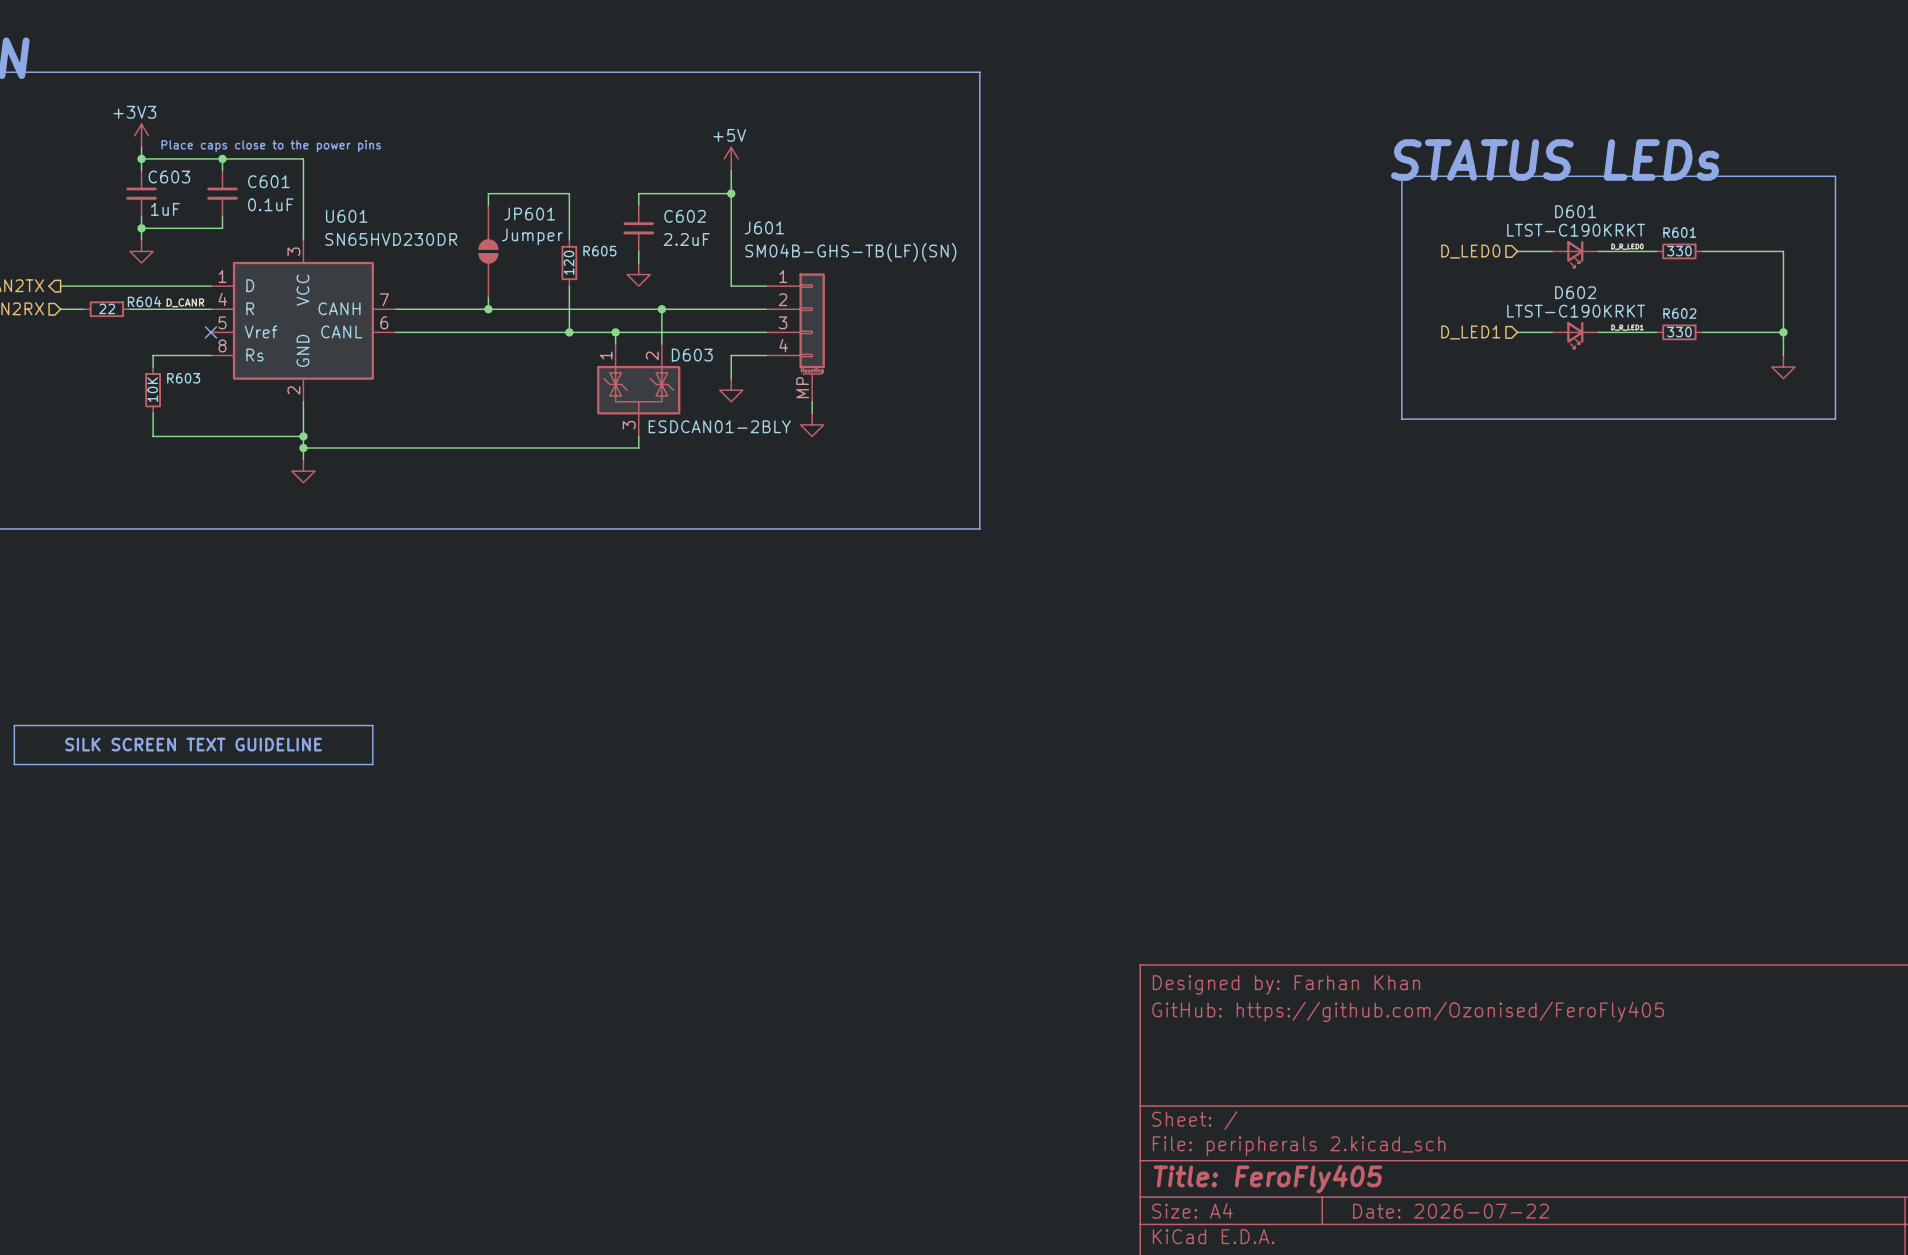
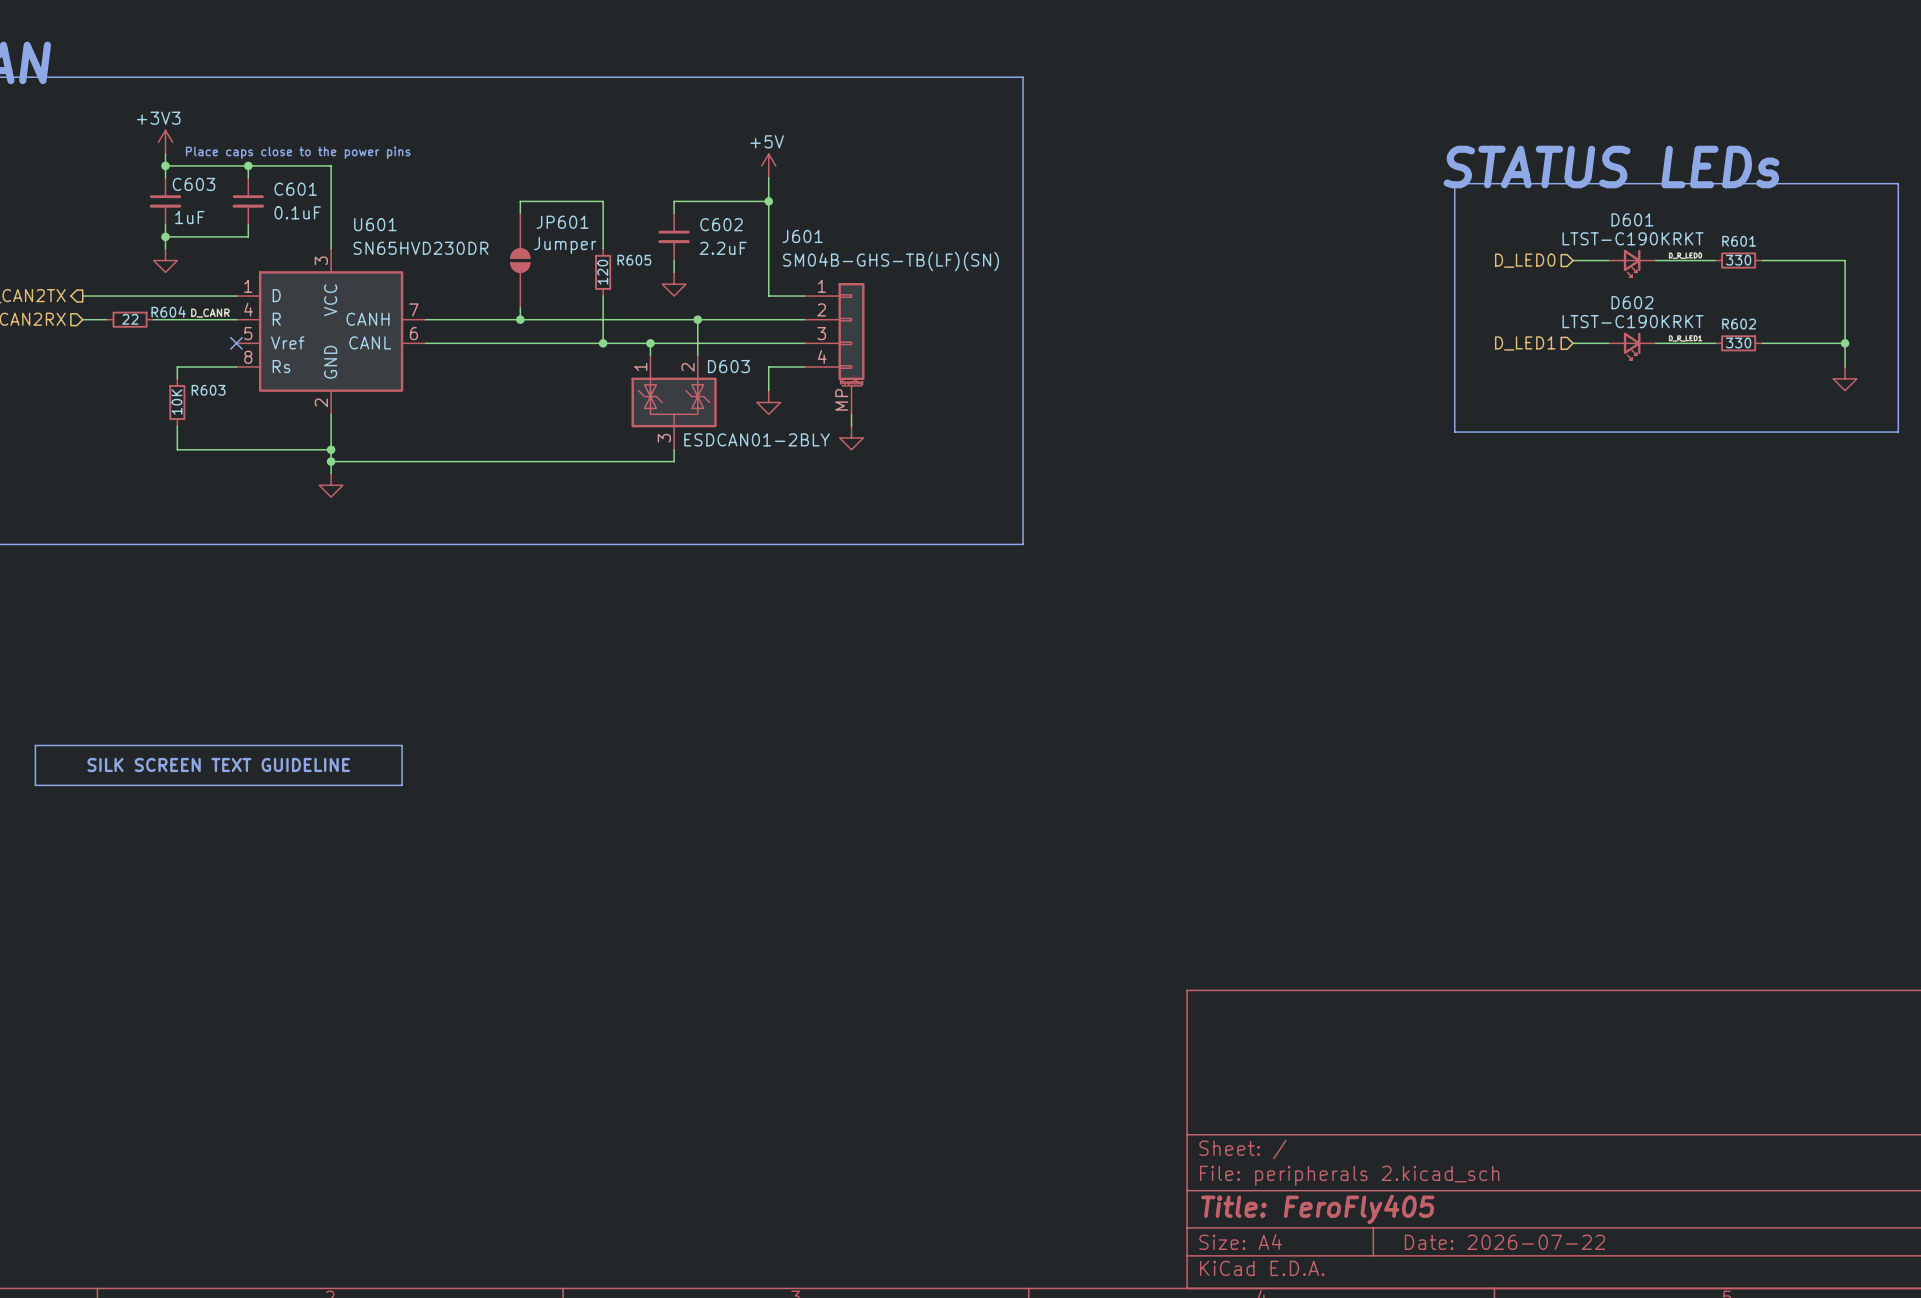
title block: Designed by: Farhan Khan (1286, 984) -> none
title block: GitHub: https://github.com/Ozonised/FeroFly405 (1408, 1011) -> none

